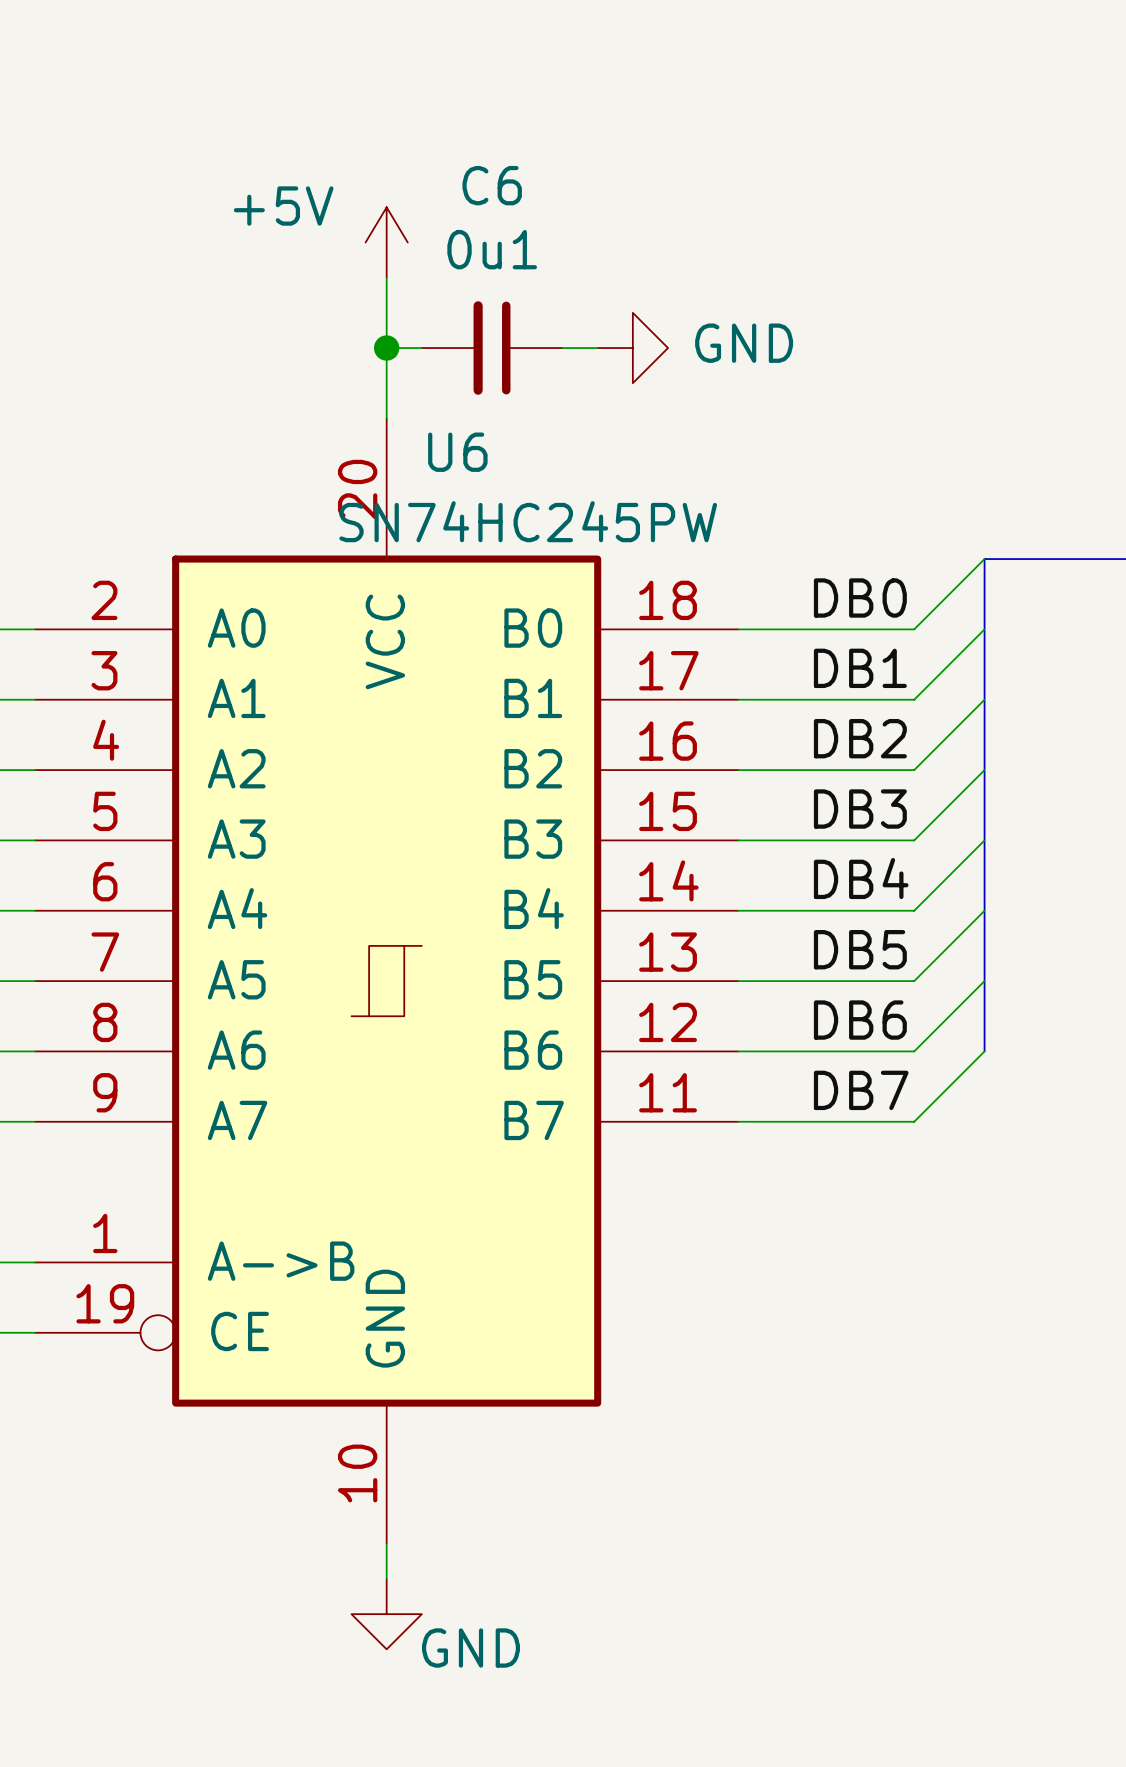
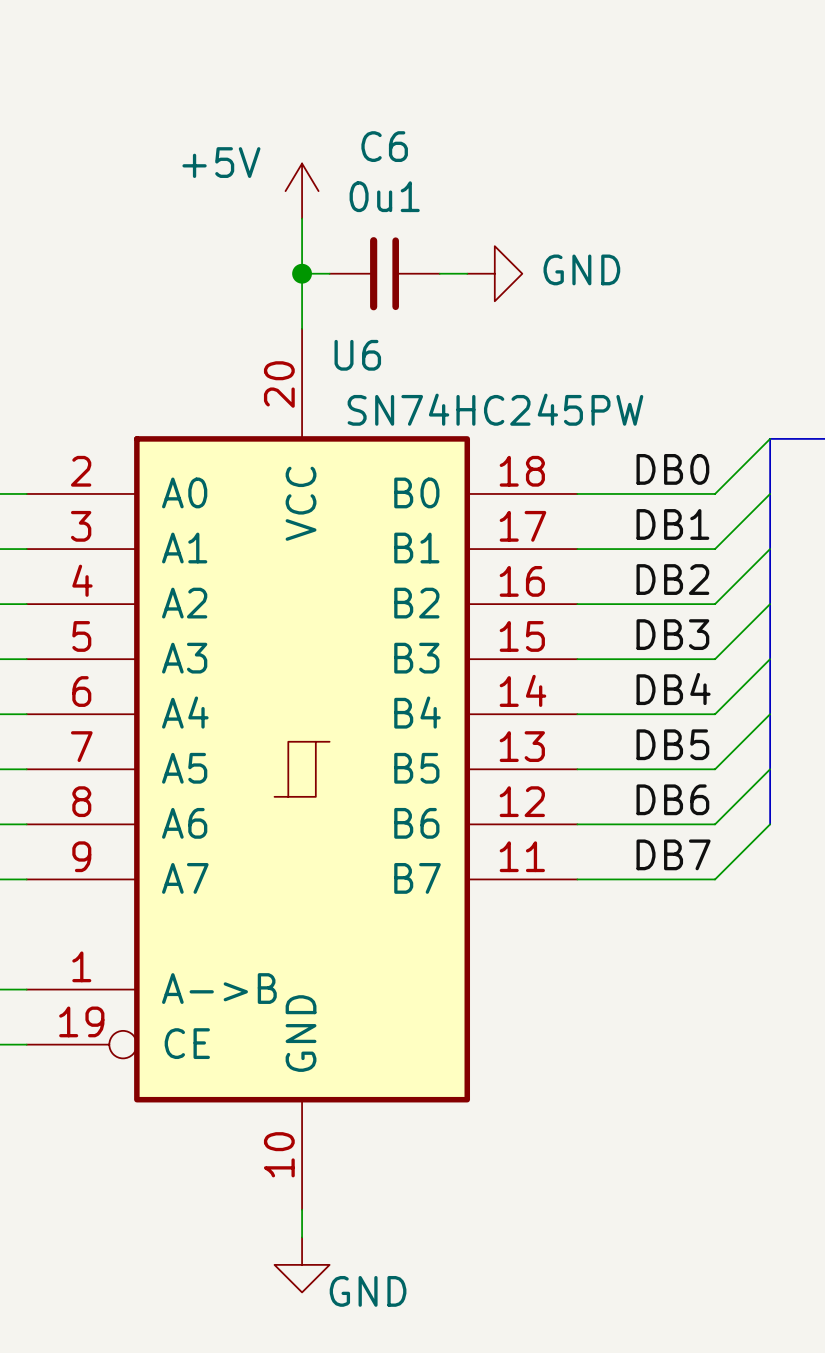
U6 value position: SN74HC245PW (528, 521) -> SN74HC245PW (495, 409)

